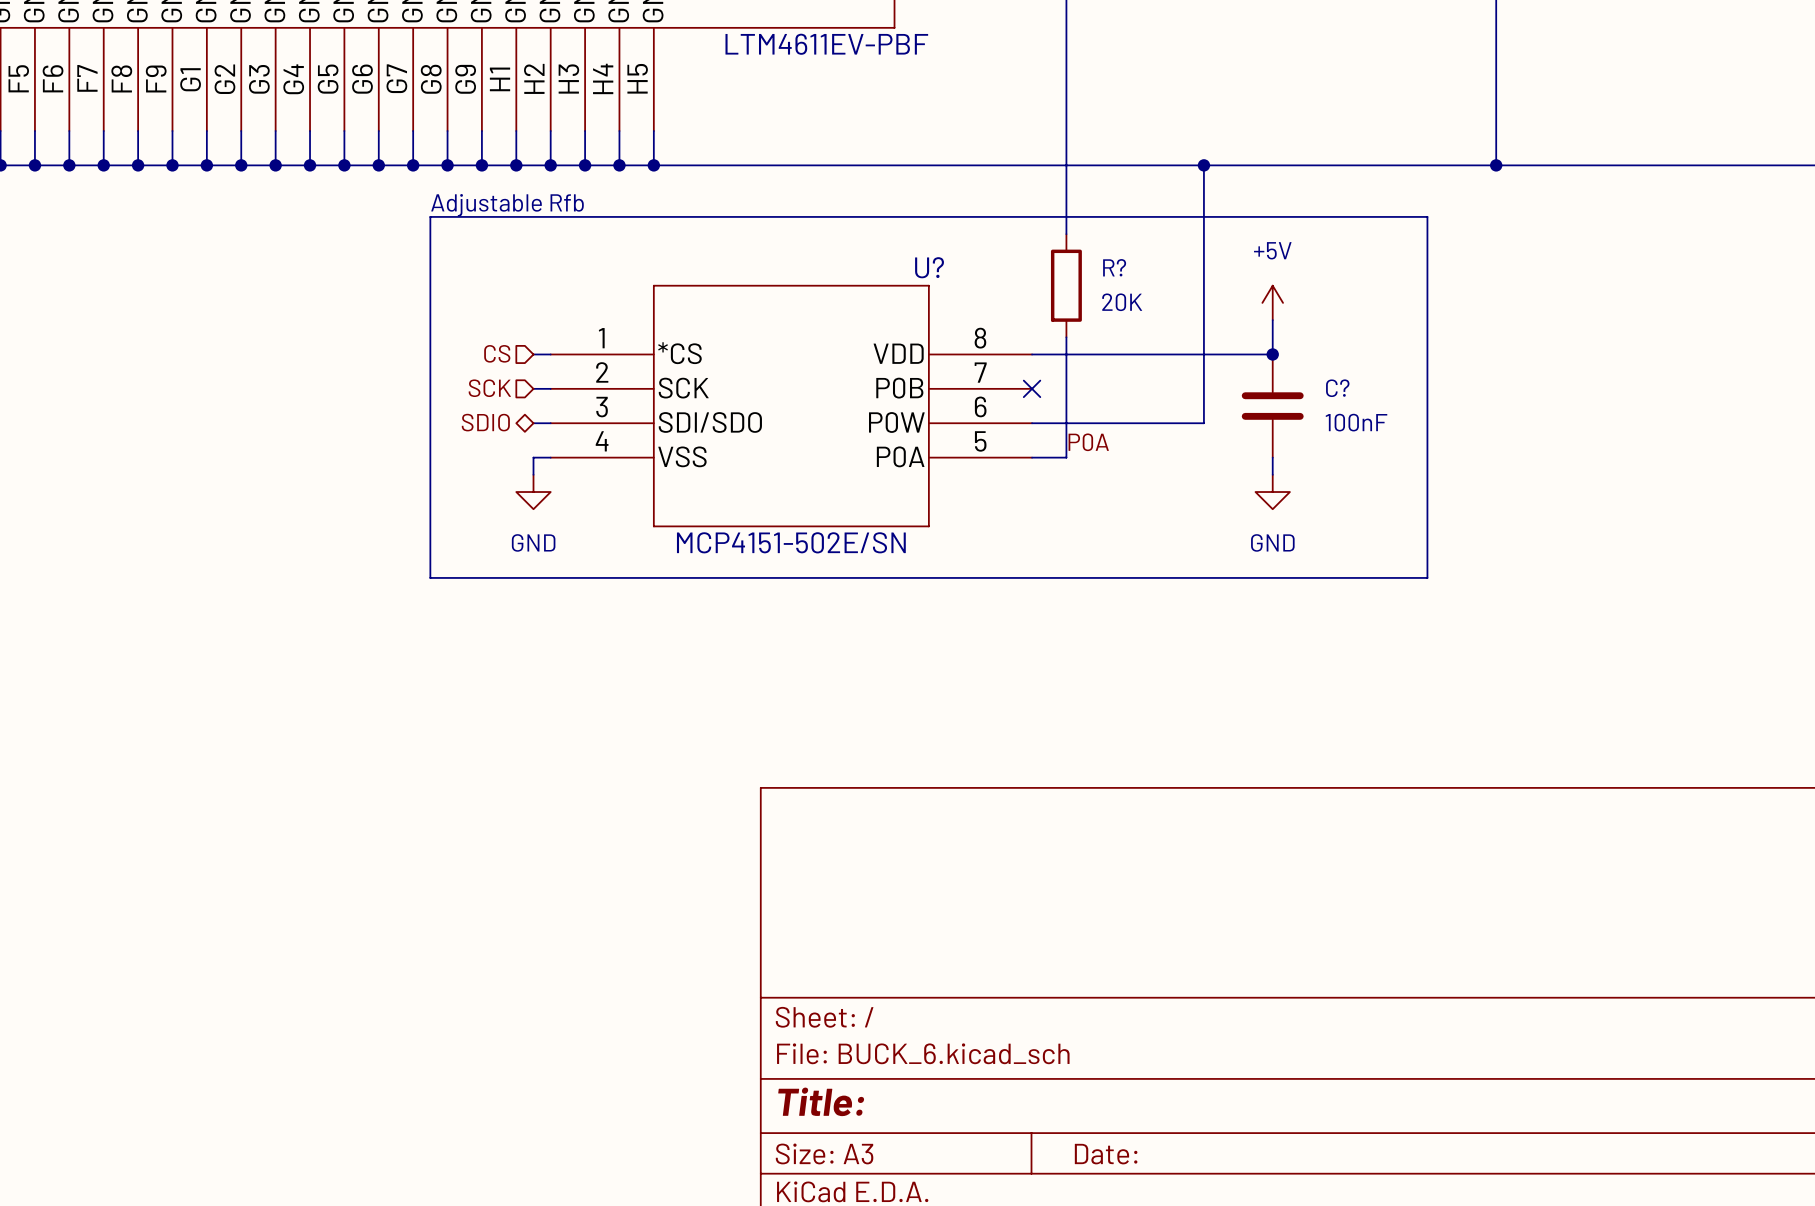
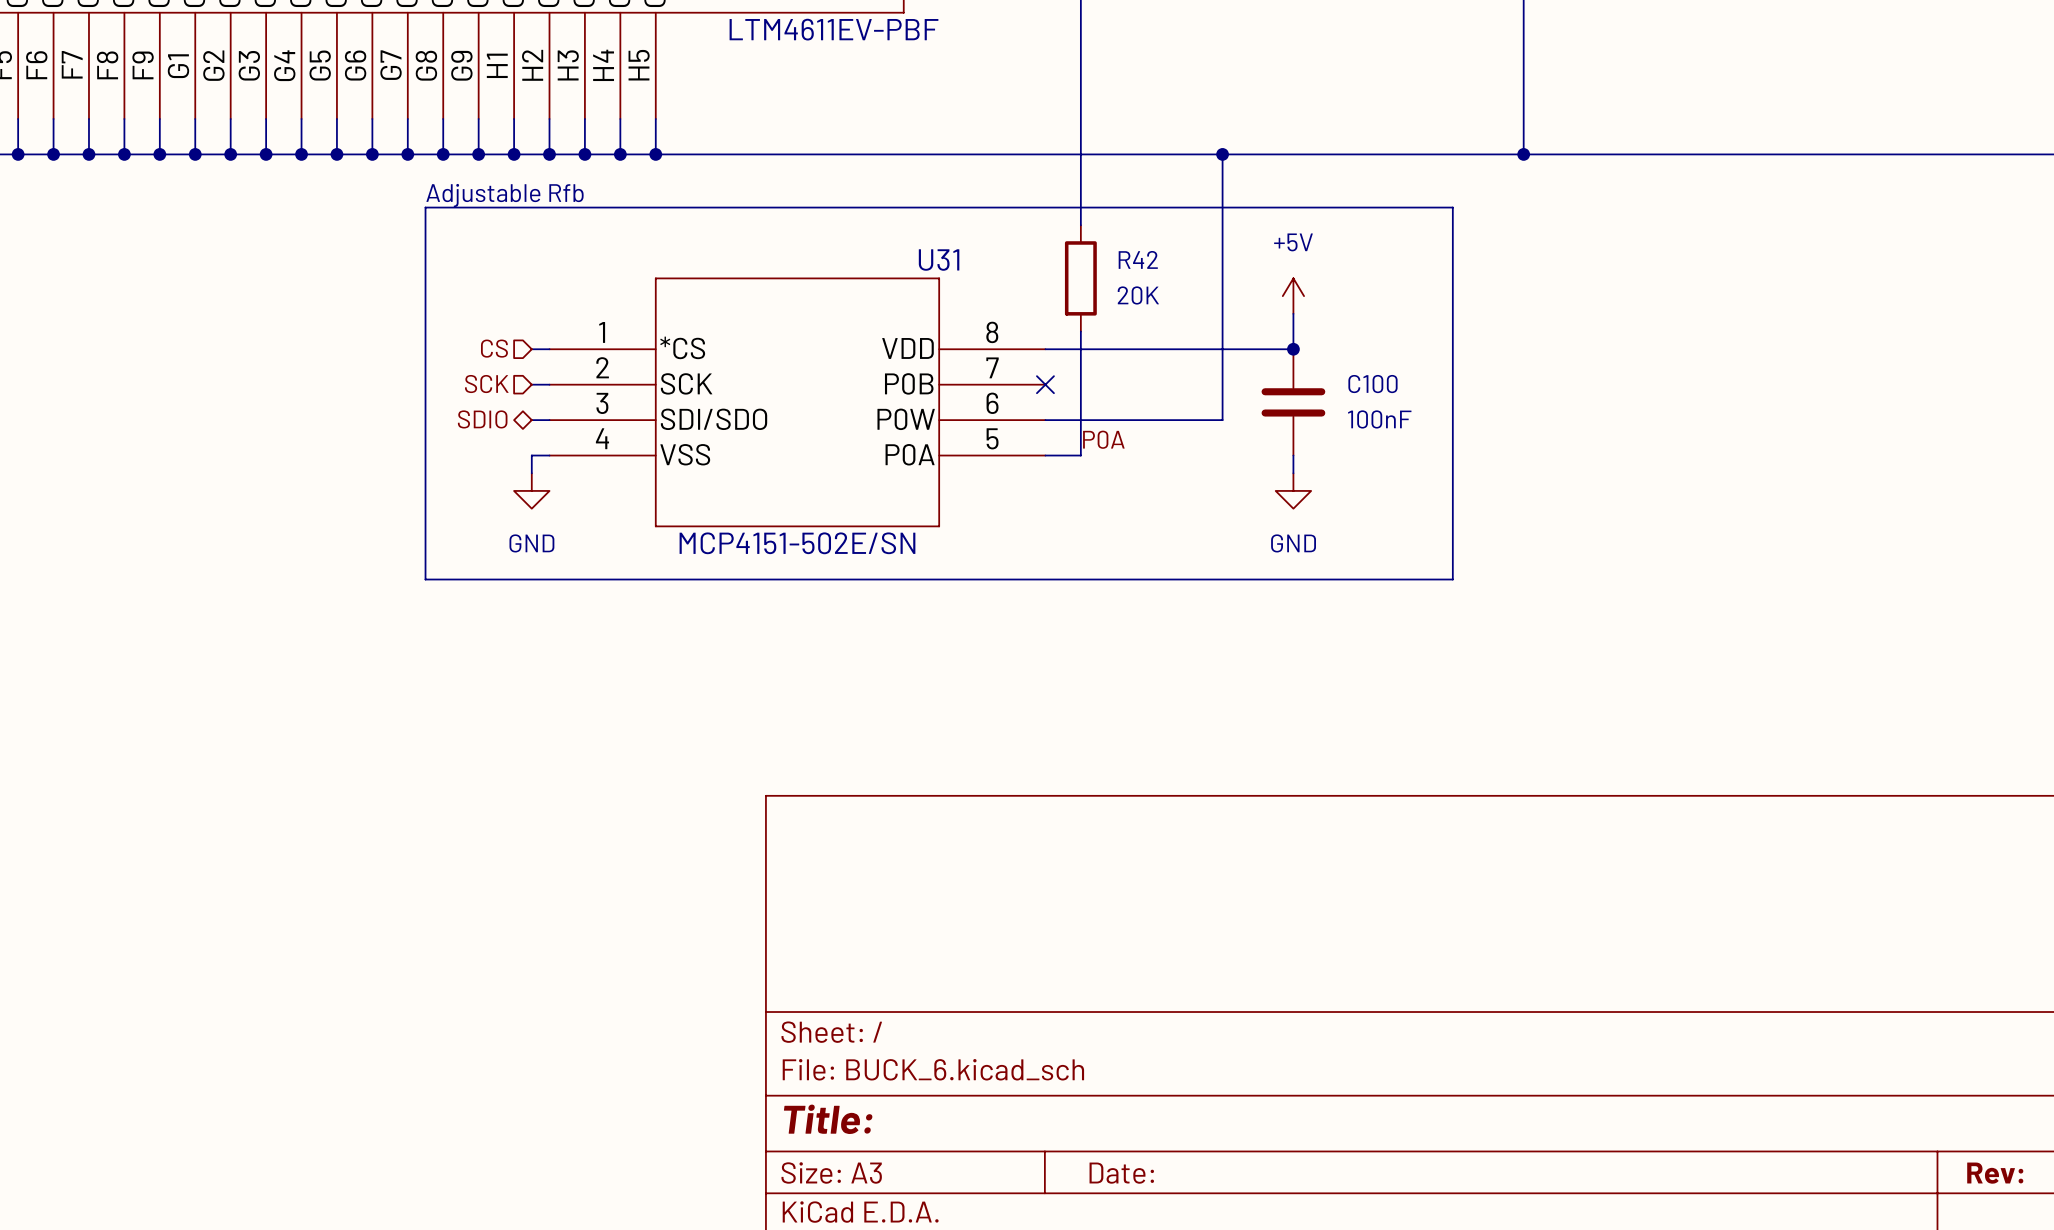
U? name: U? (929, 267) -> U31 (939, 260)
R? name: R? (1114, 267) -> R42 (1138, 259)
C? name: C? (1337, 388) -> C100 (1372, 384)

